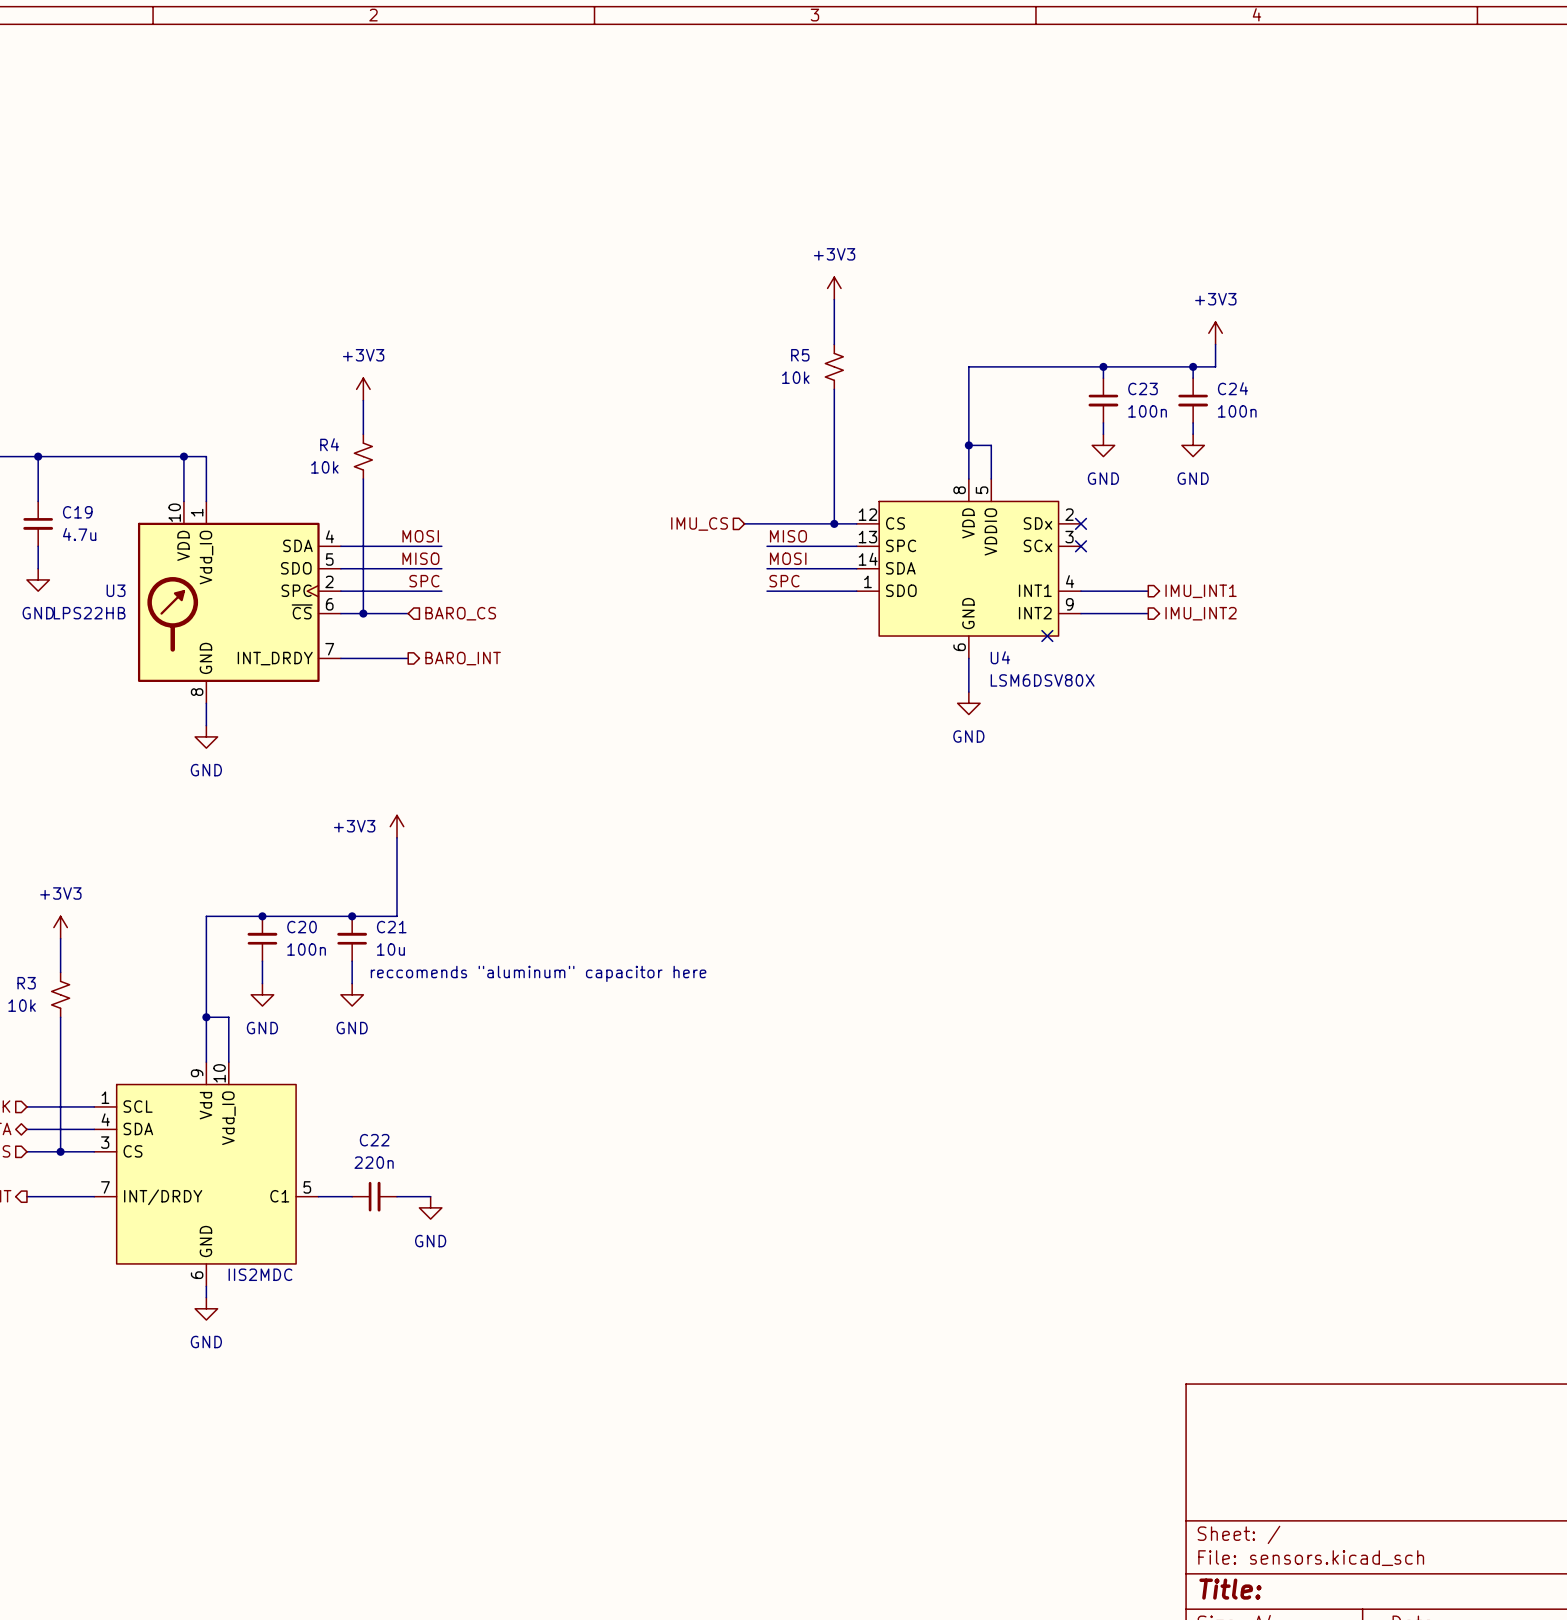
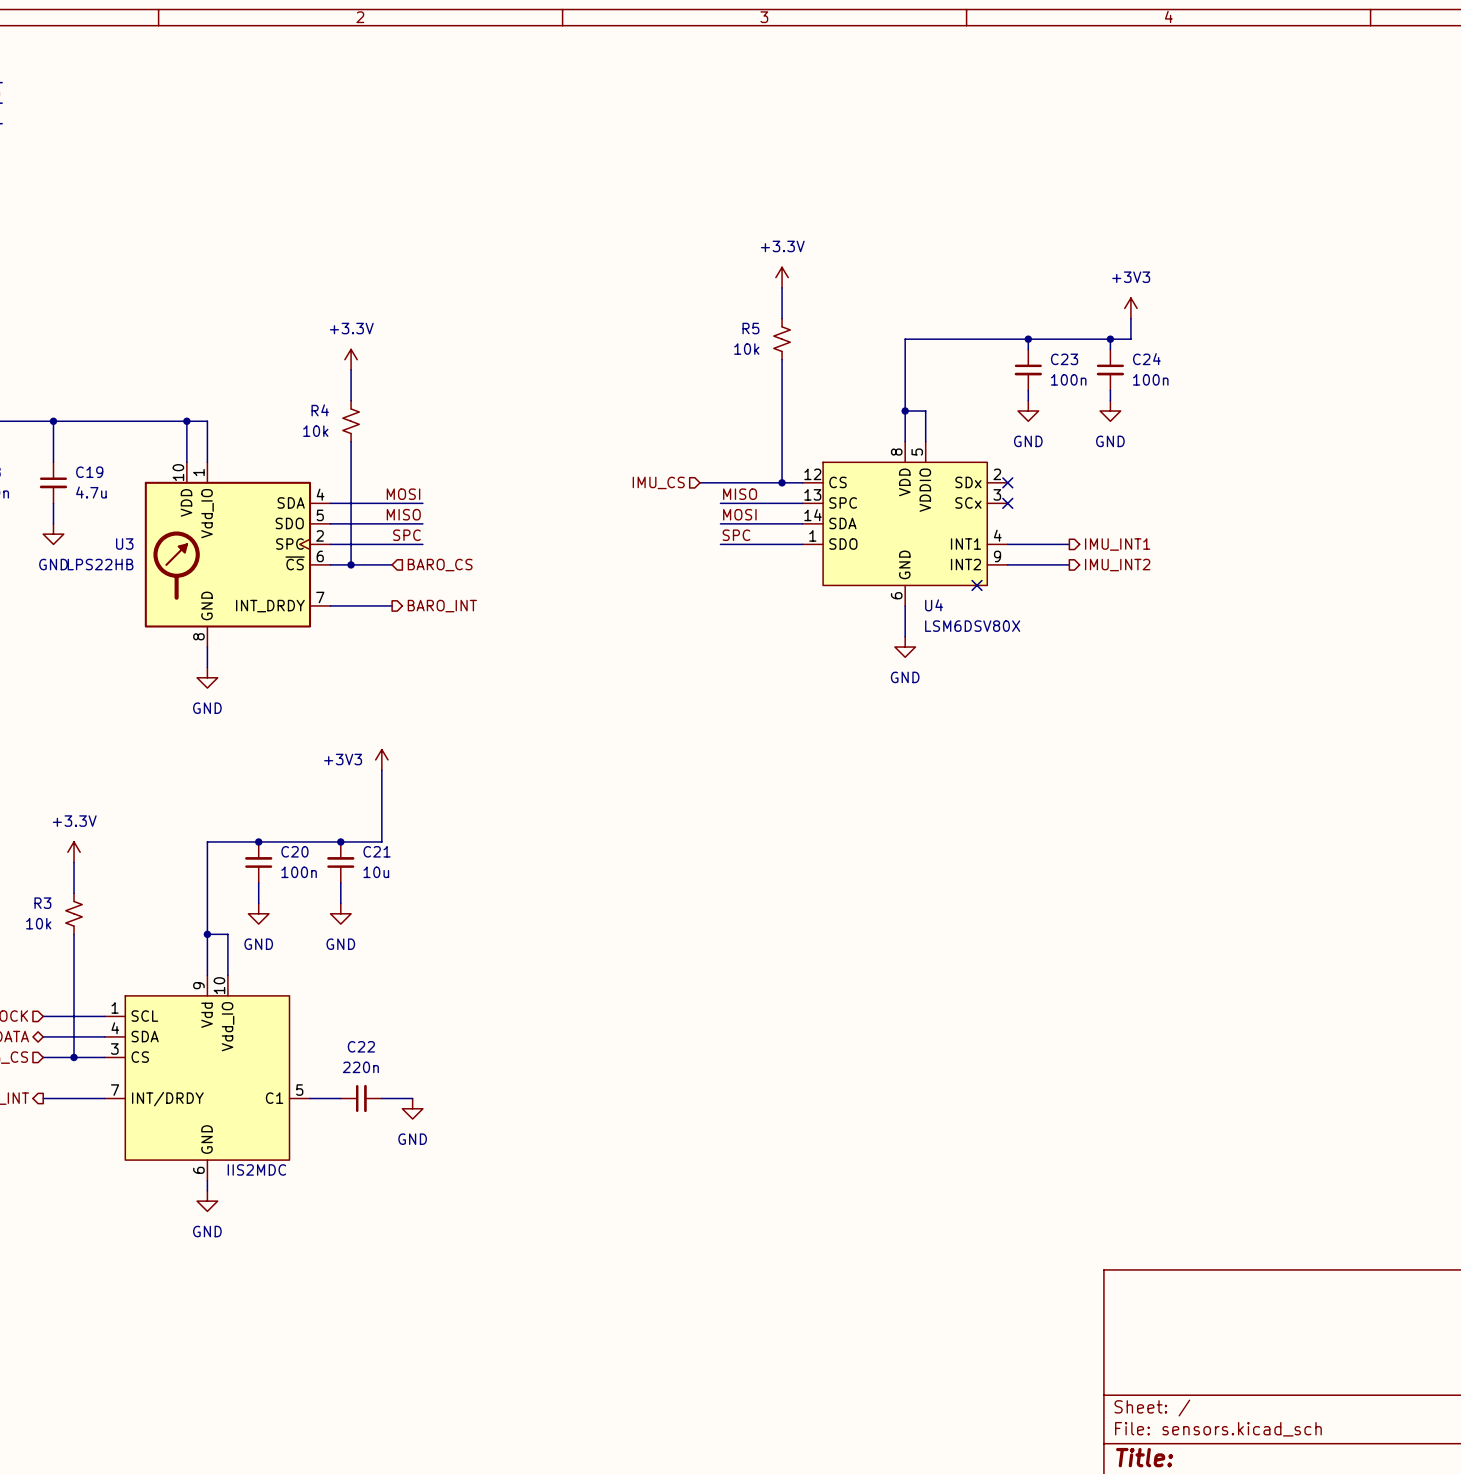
power symbol: +3V3 (834, 288) -> none
power symbol: none -> +3.3V (782, 277)
power symbol: +3V3 (363, 389) -> +3.3V (351, 359)
power symbol: +3V3 (60, 927) -> +3.3V (74, 852)
text: reccomends "aluminum" capacitor here (538, 973) -> none

